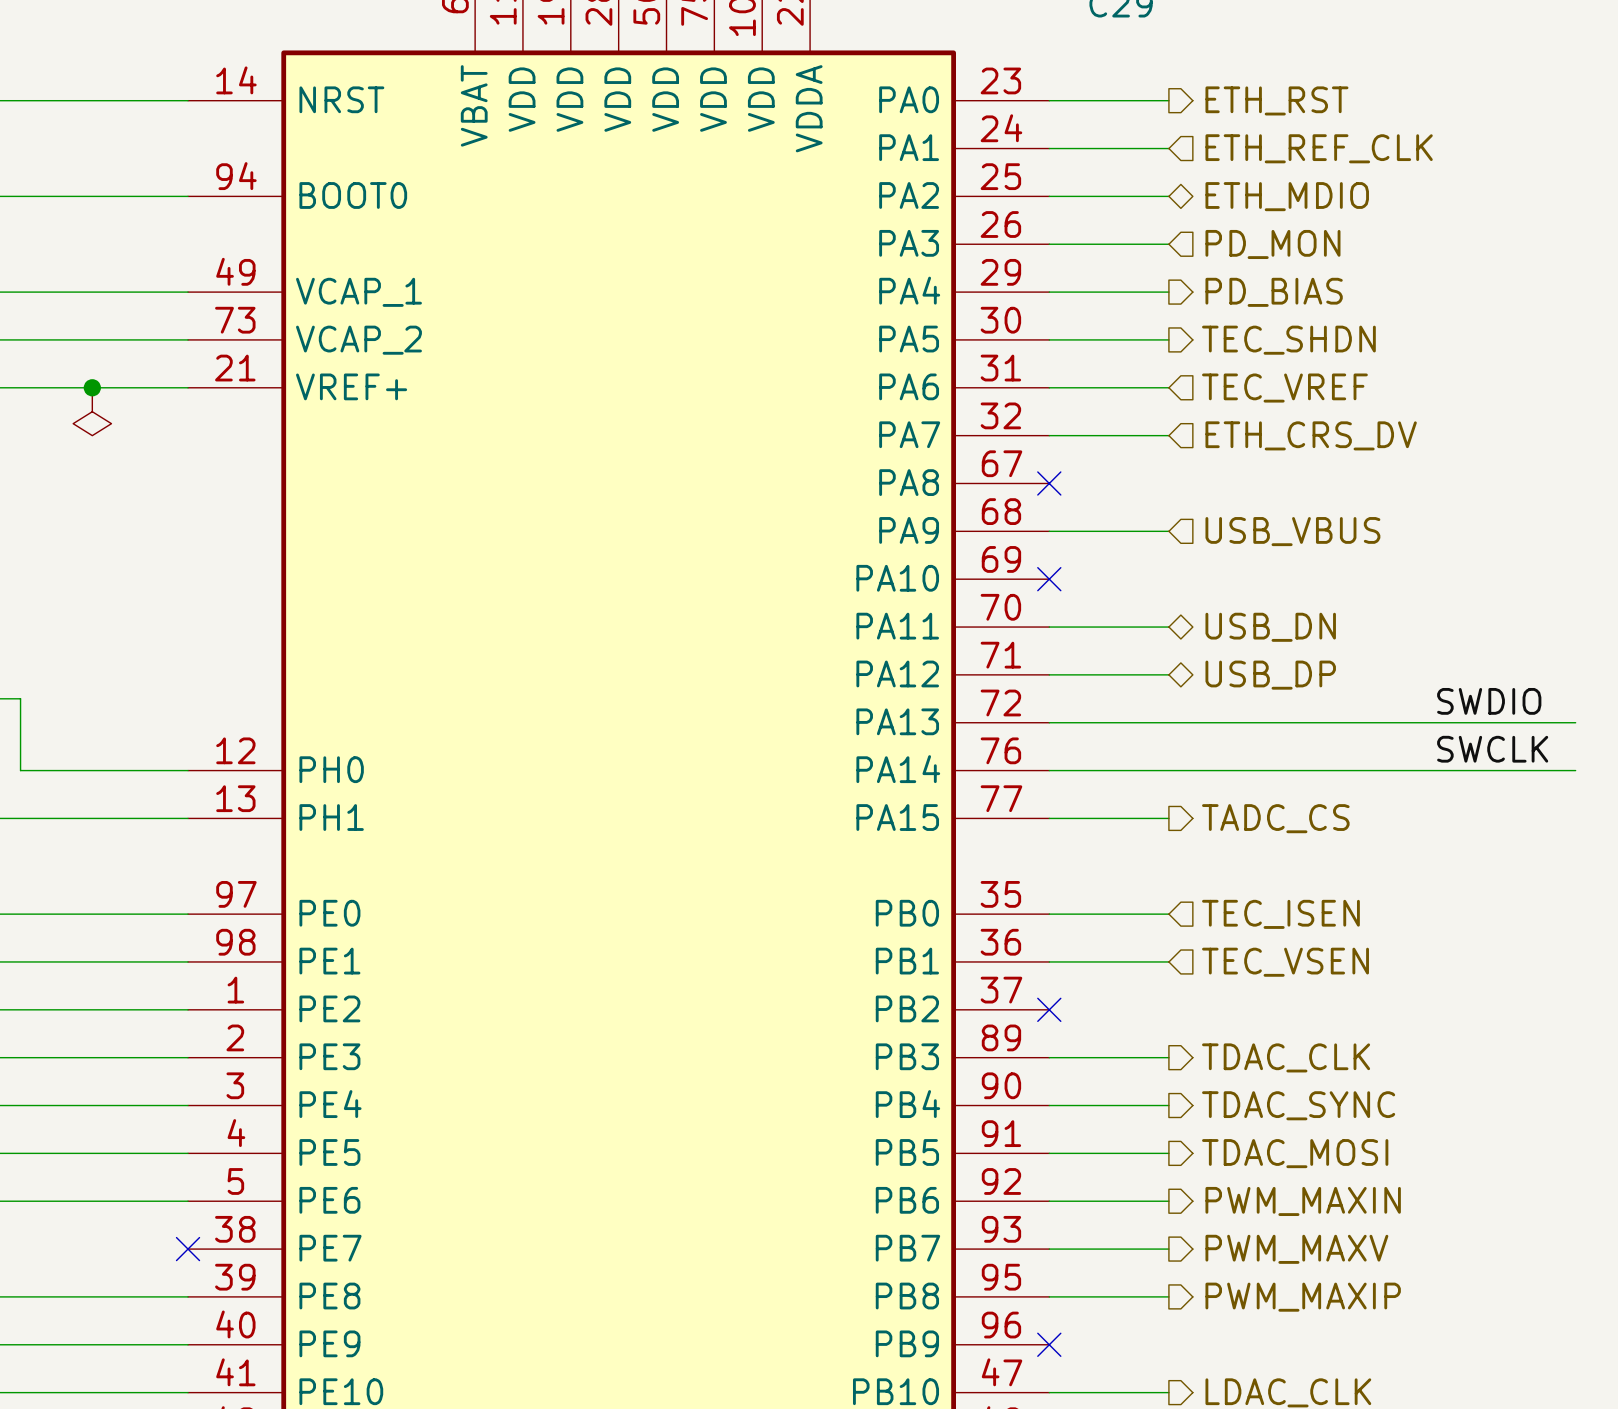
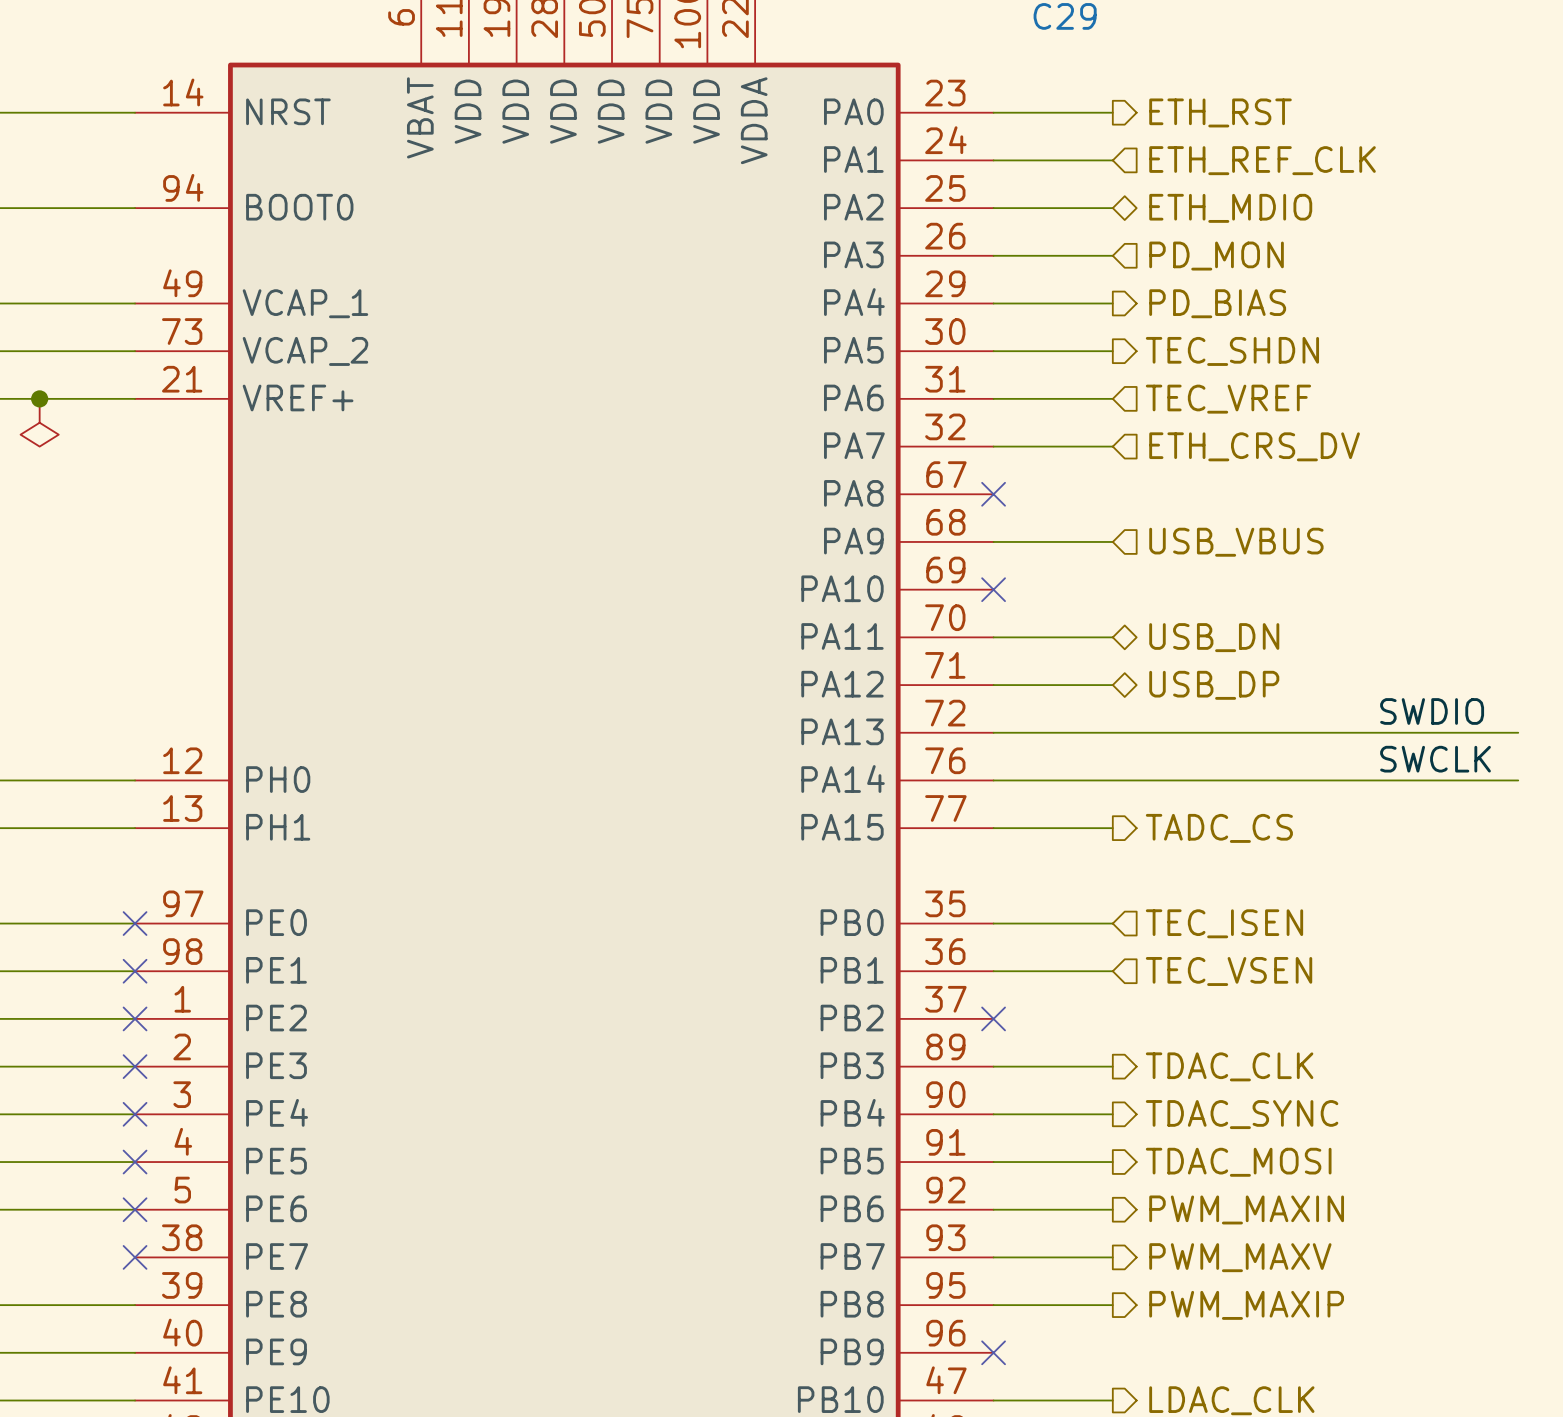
no-connect mark: none -> (135, 923)
no-connect mark: none -> (135, 971)
no-connect mark: none -> (135, 1018)
no-connect mark: none -> (135, 1066)
no-connect mark: none -> (135, 1114)
no-connect mark: none -> (135, 1162)
no-connect mark: none -> (135, 1209)

